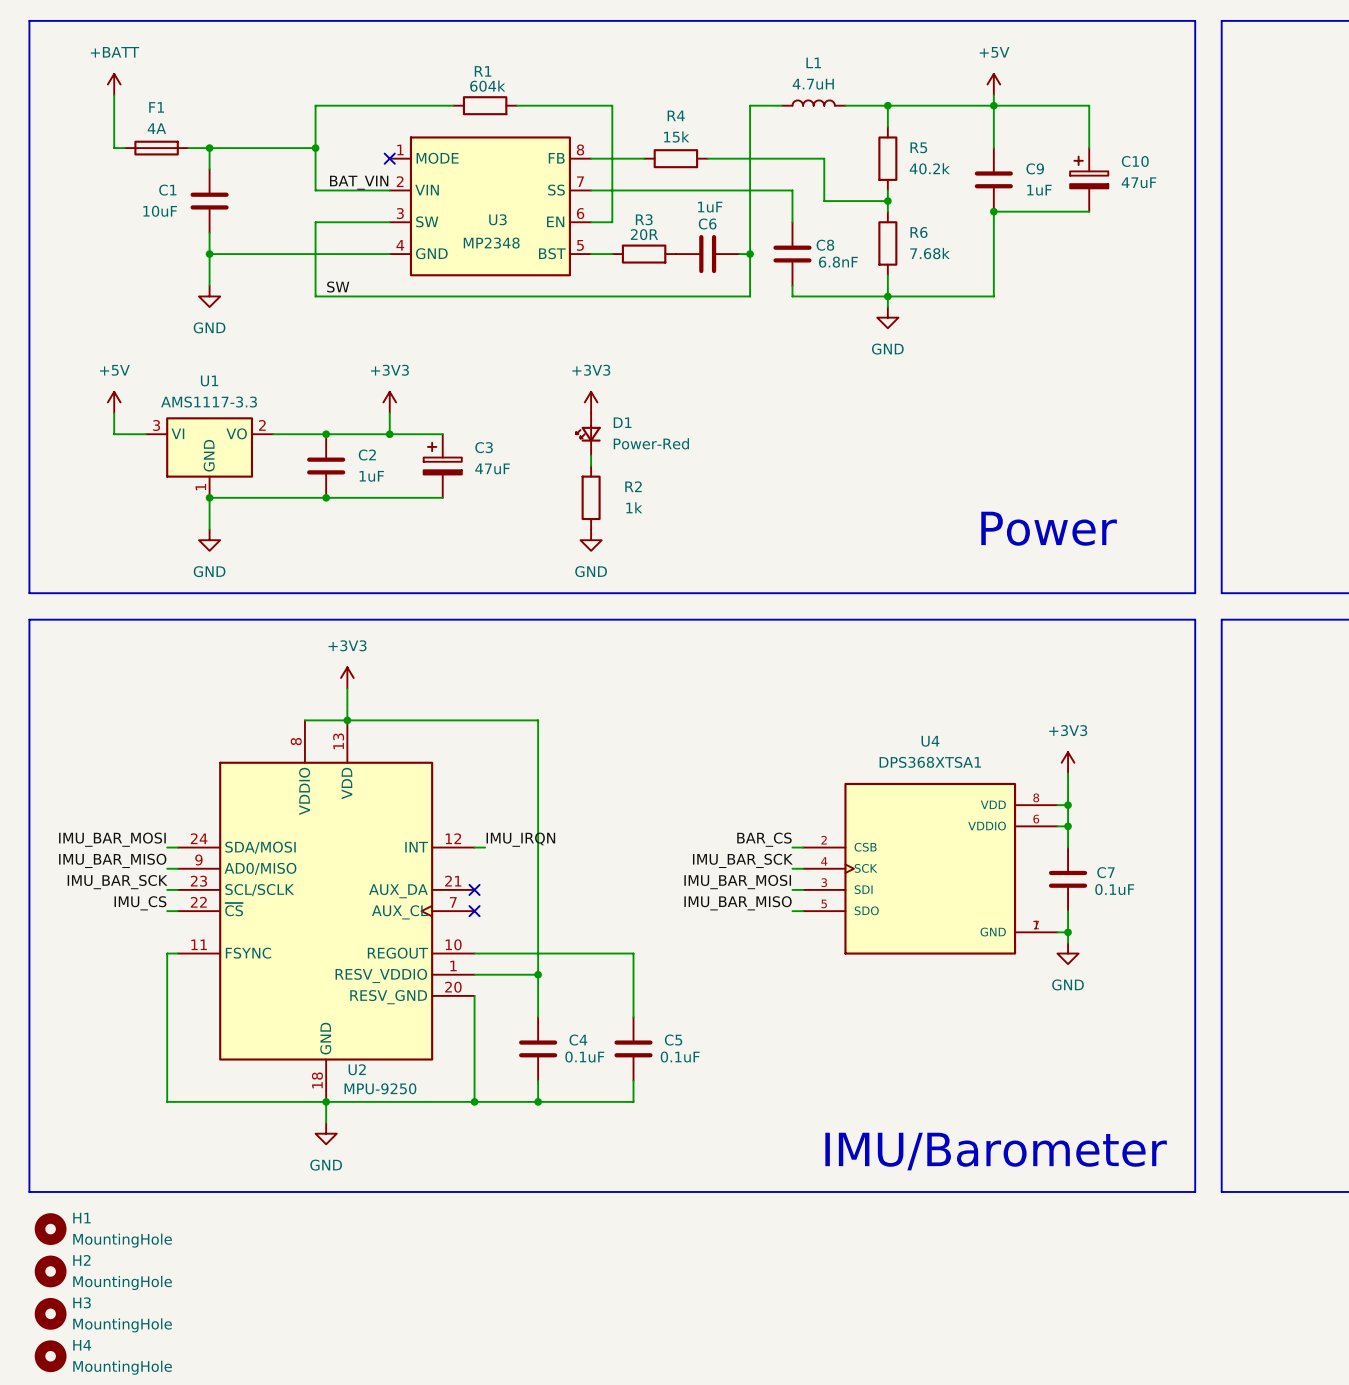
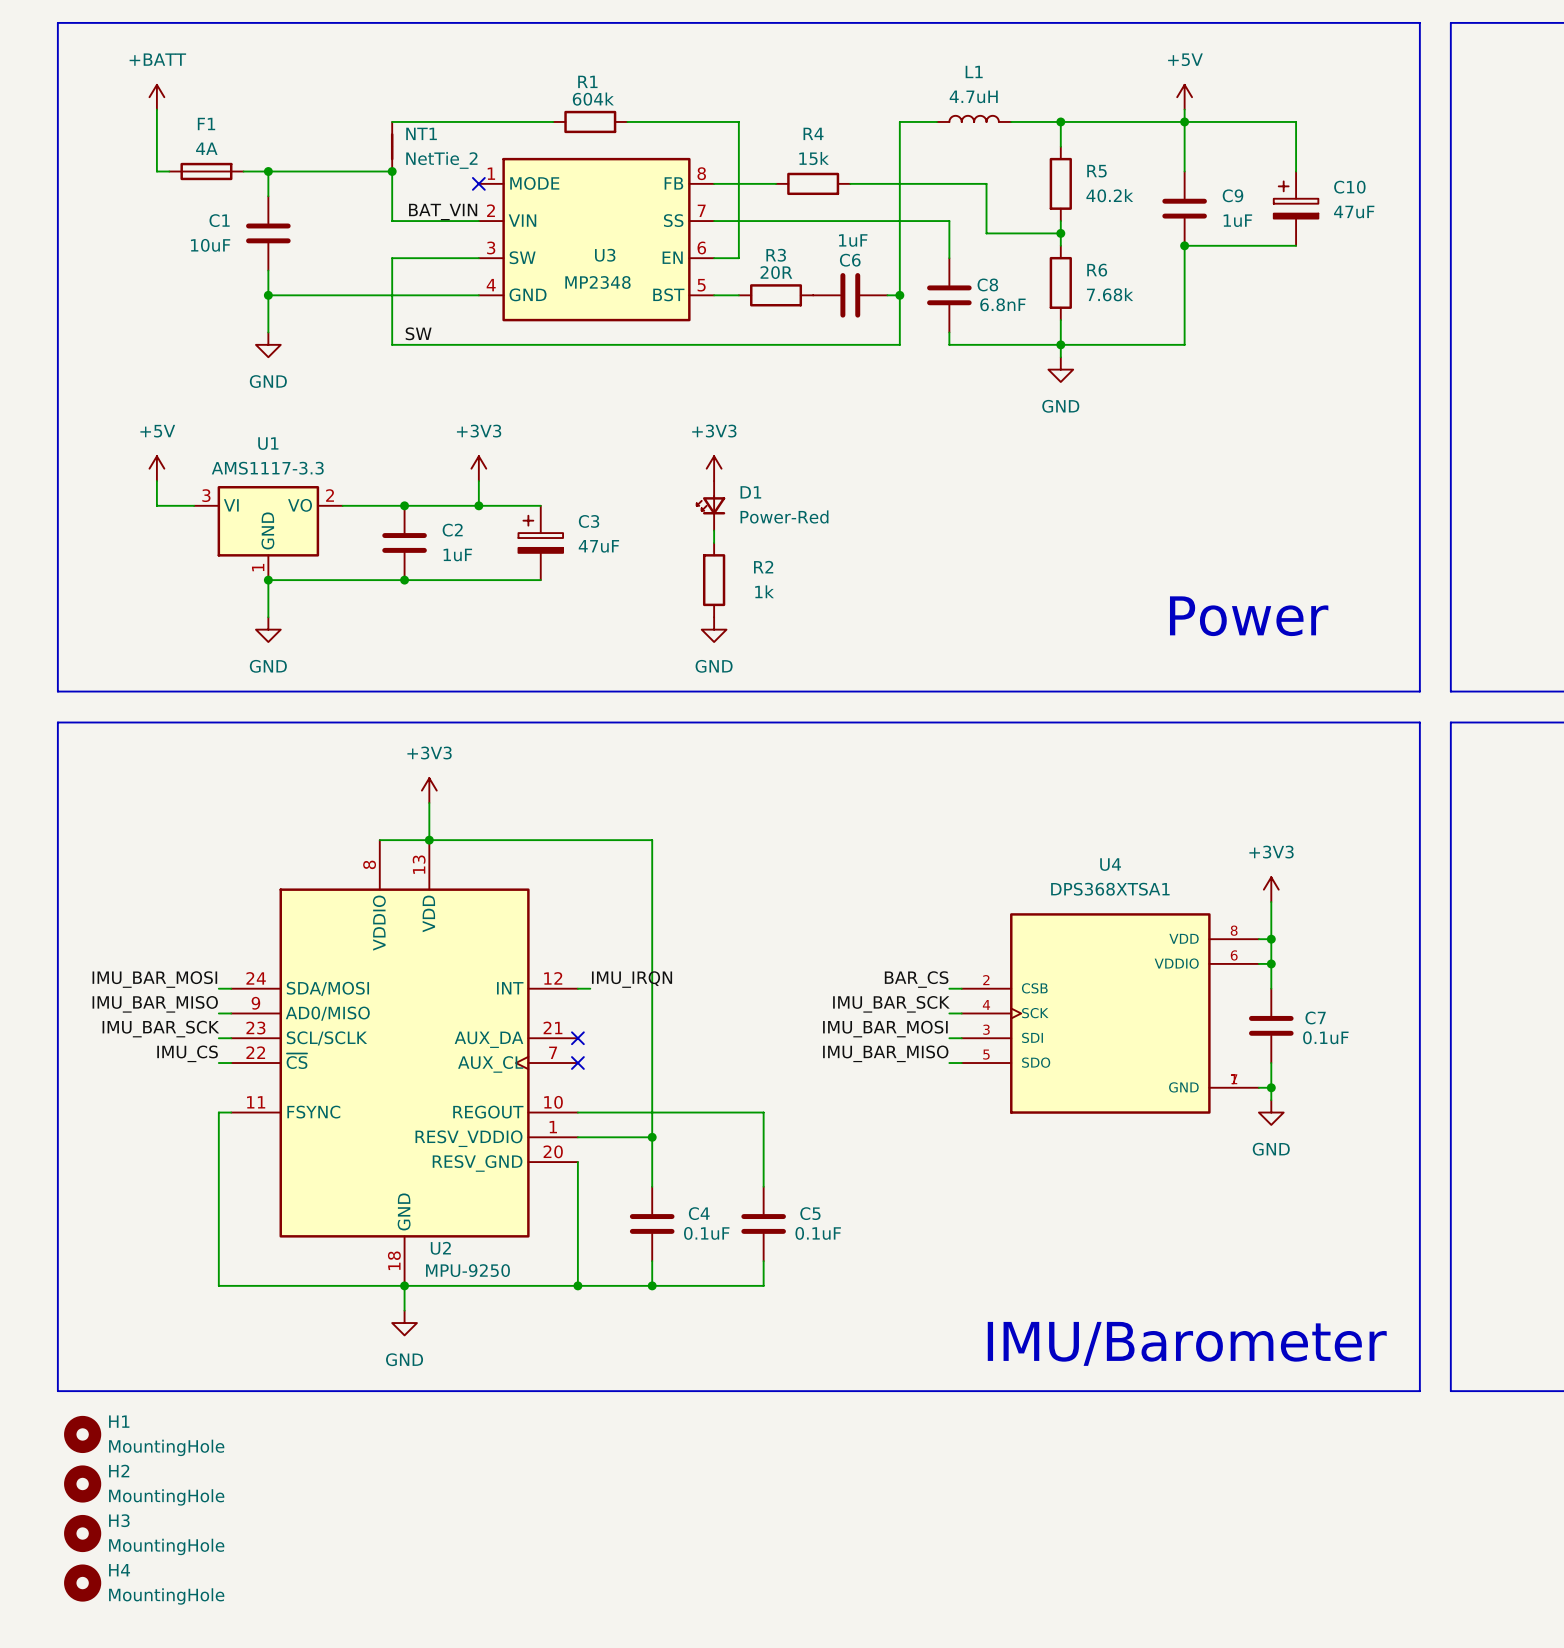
NT1: none -> NetTie_2 (392, 146)

